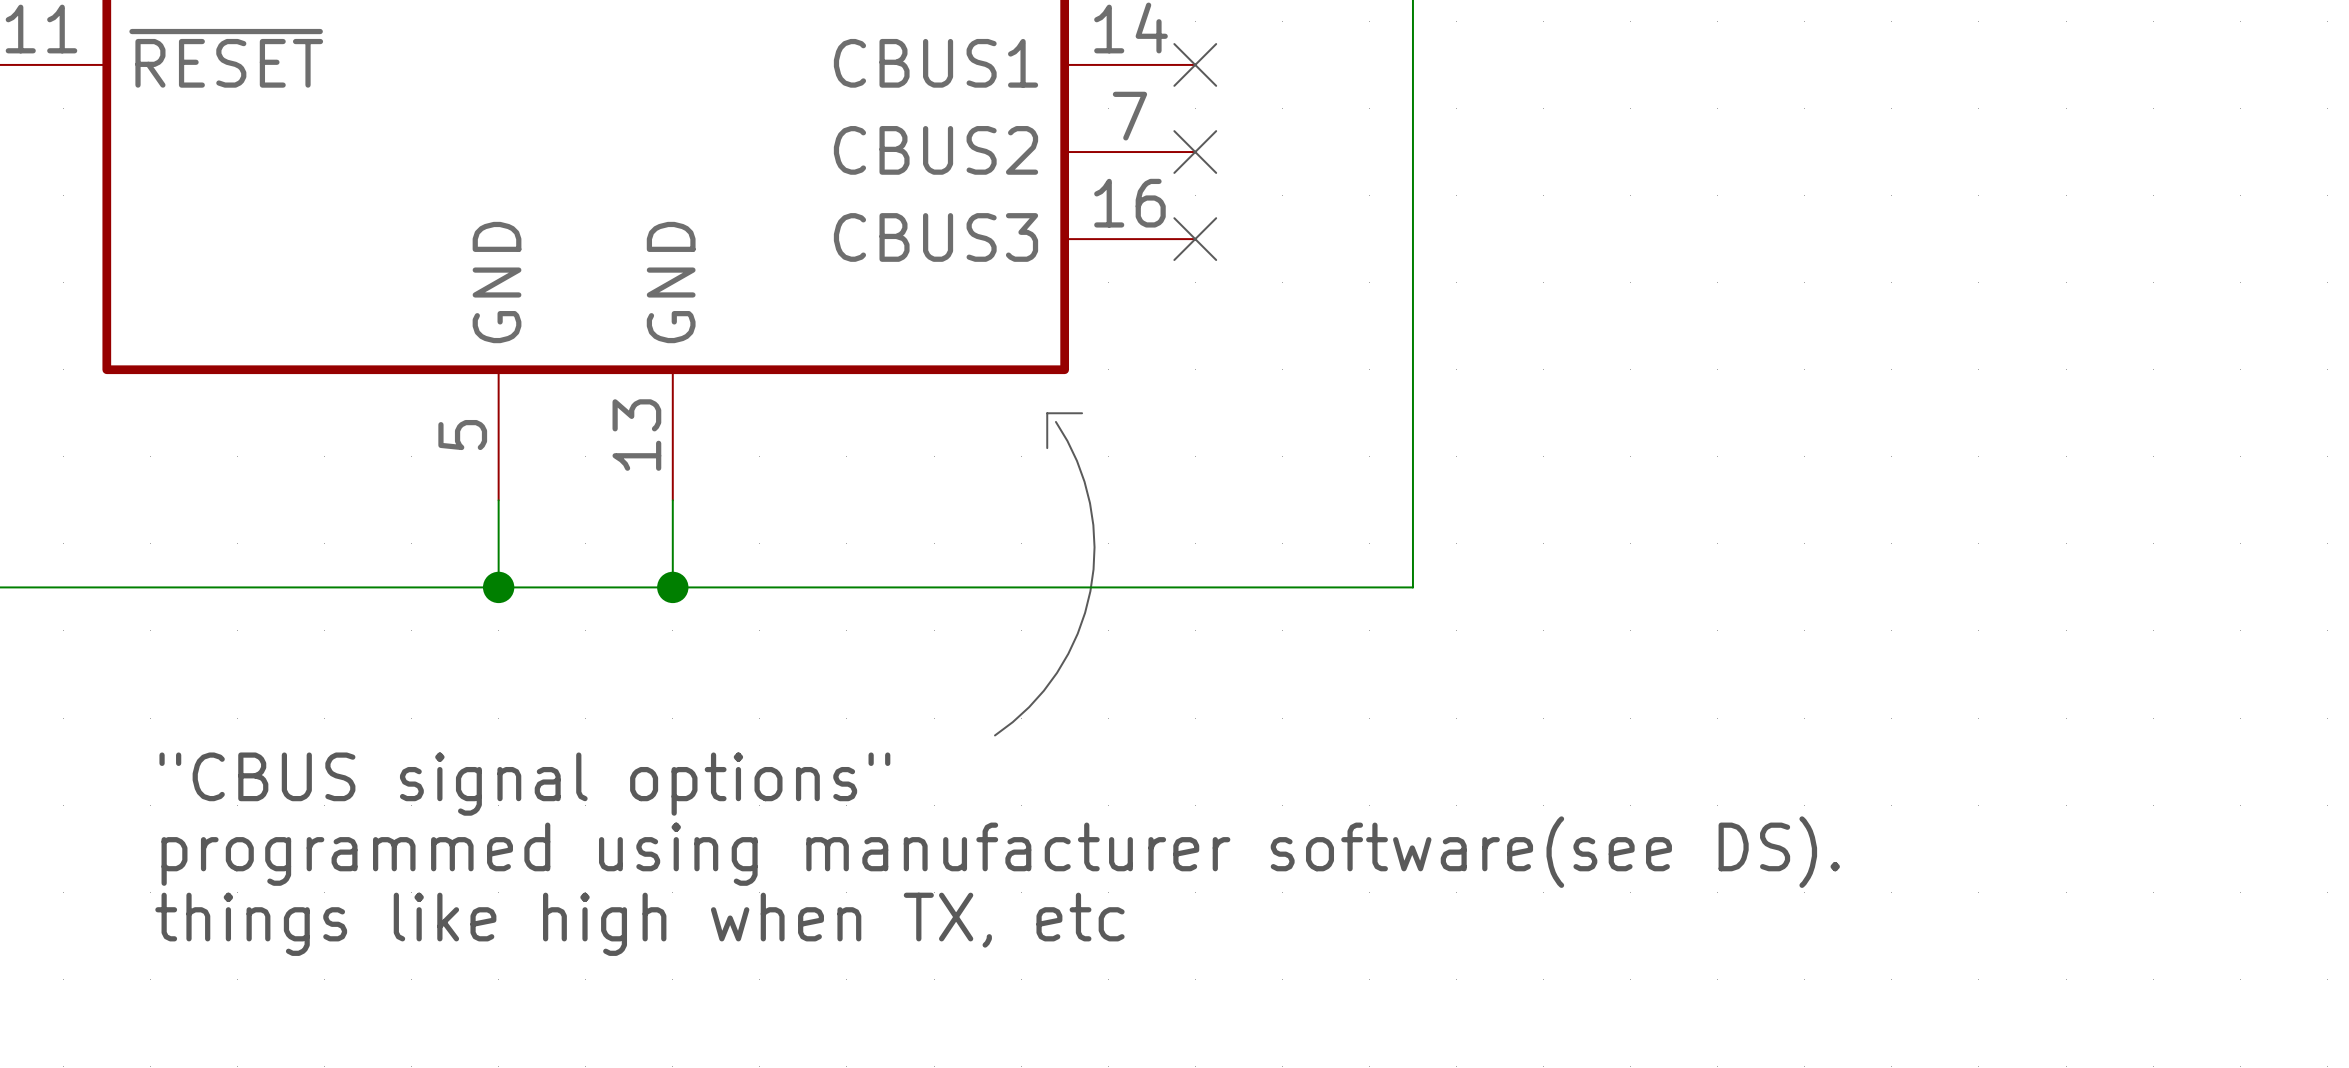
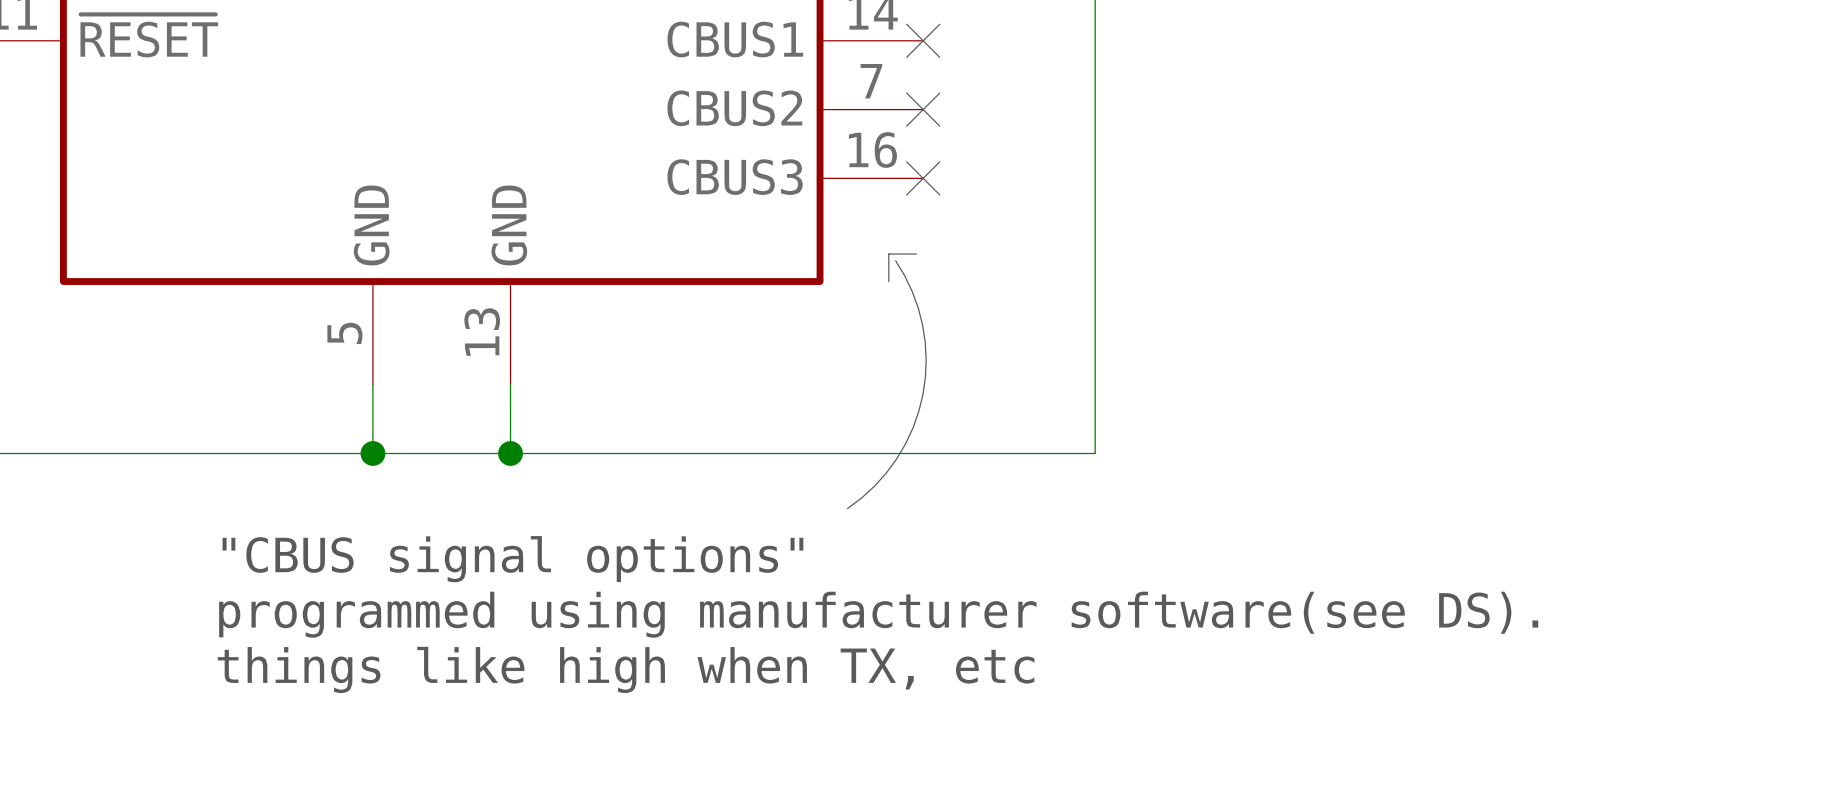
line: (1082, 413) (1047, 413) (1047, 448) -> (916, 254) (888, 254) (888, 281)
line: (1055, 421) (1076, 460) (1090, 503) (1094, 547) (1090, 591) (1077, 633) (1057, 672) (1029, 707) (994, 735) -> (895, 260) (912, 291) (922, 325) (926, 359) (922, 394) (912, 428) (896, 459) (874, 486) (847, 508)
text position: "CBUS signal options" (524, 784) -> "CBUS signal options" (512, 559)
text position: programmed using manufacturer software(see DS). (1000, 852) -> programmed using manufacturer software(see DS). (878, 614)
text position: things like high when TX, etc (639, 924) -> things like high when TX, etc (626, 669)

